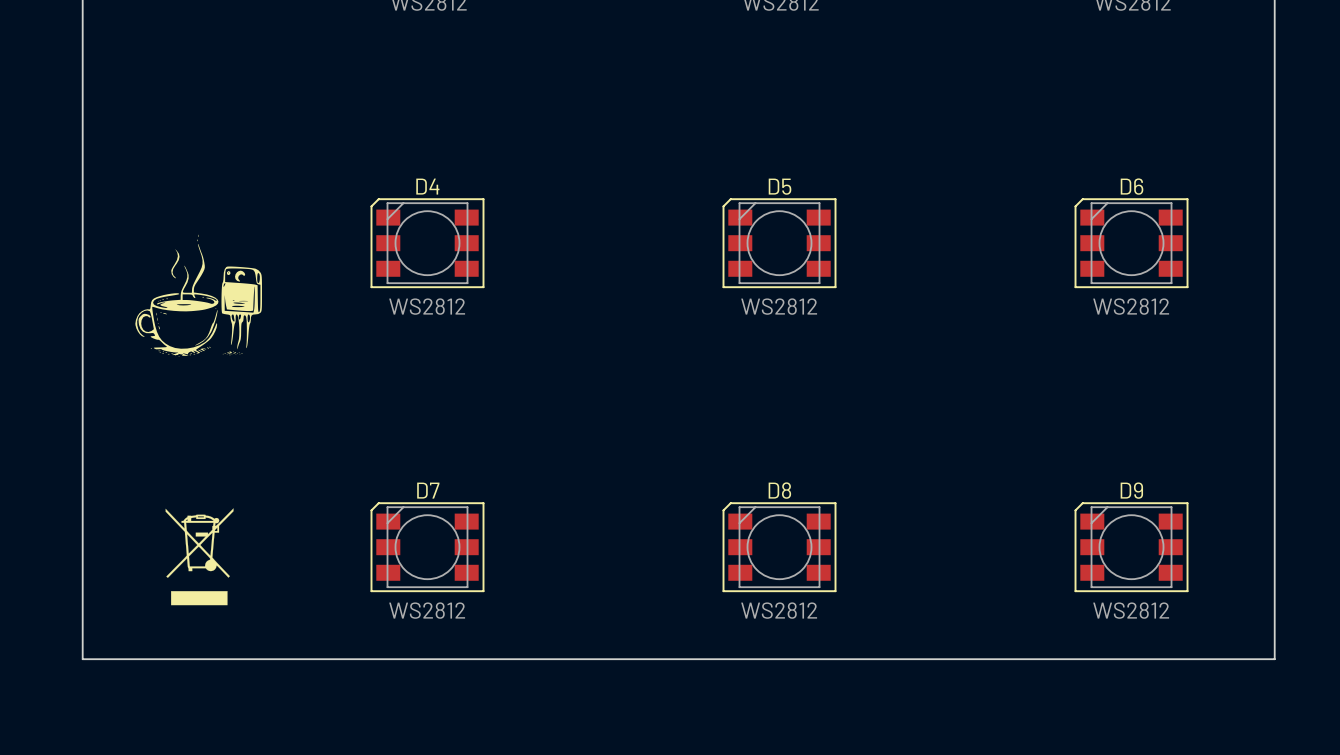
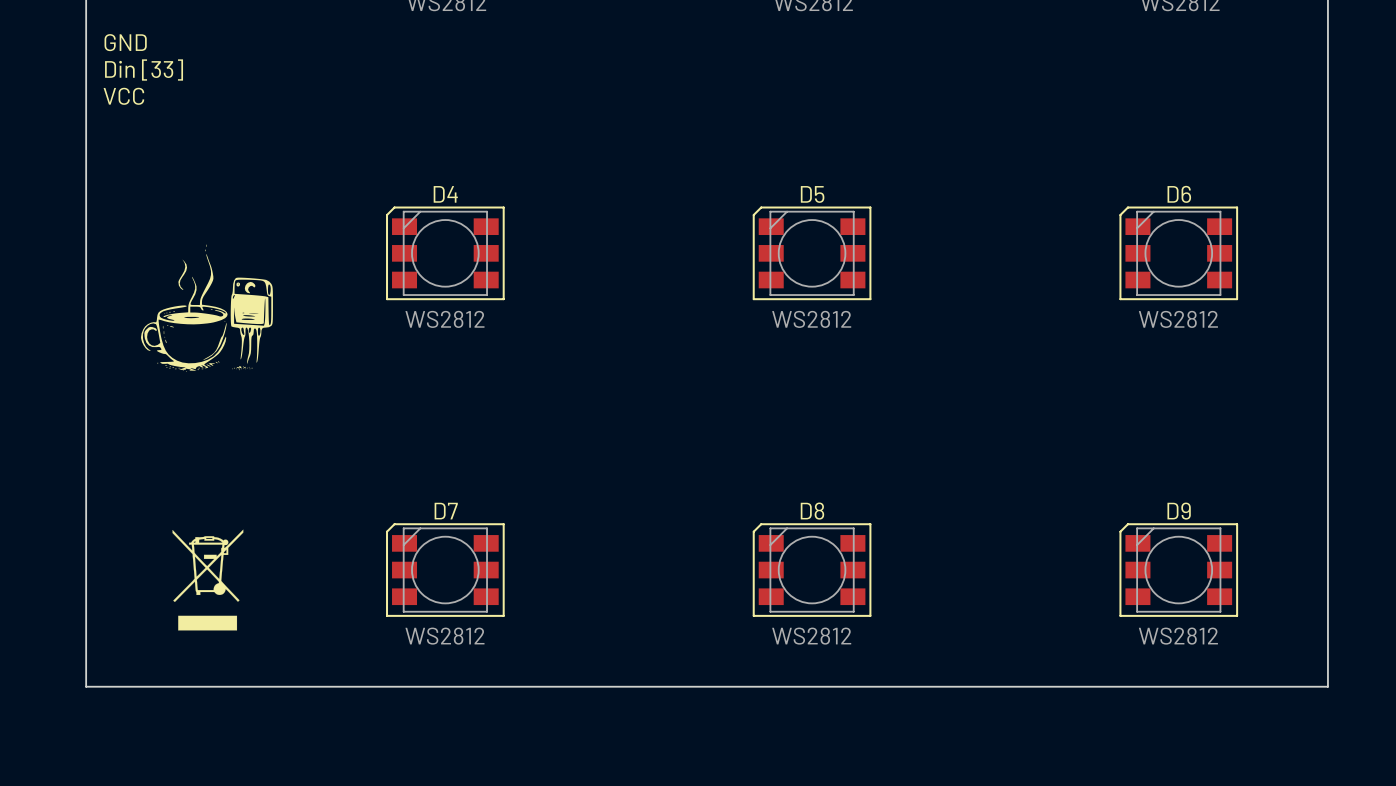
text: none -> GND (125, 42)
text: none -> Din [33] (144, 70)
text: none -> VCC (123, 96)

